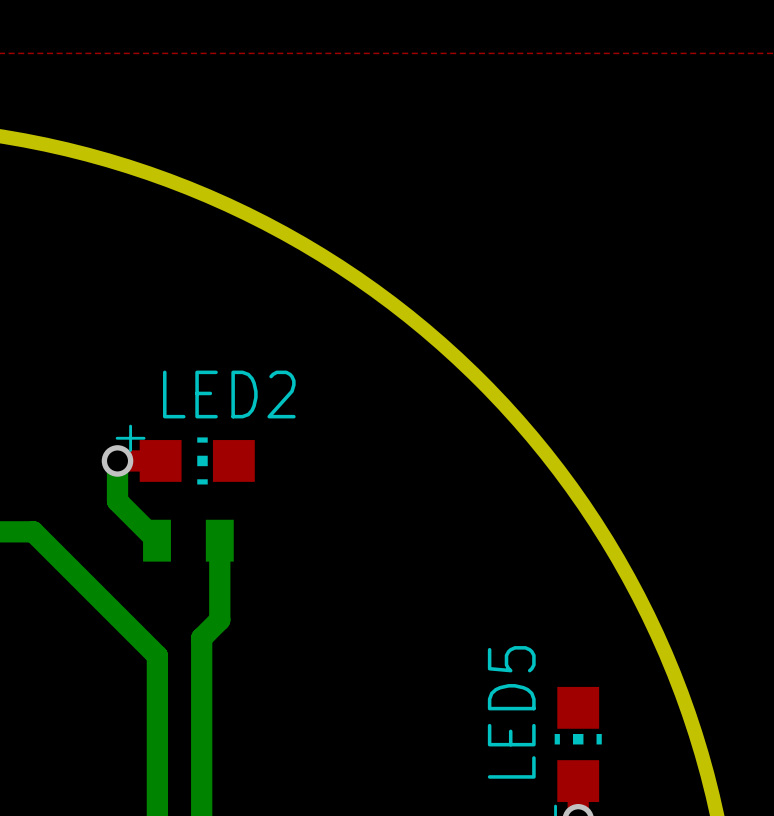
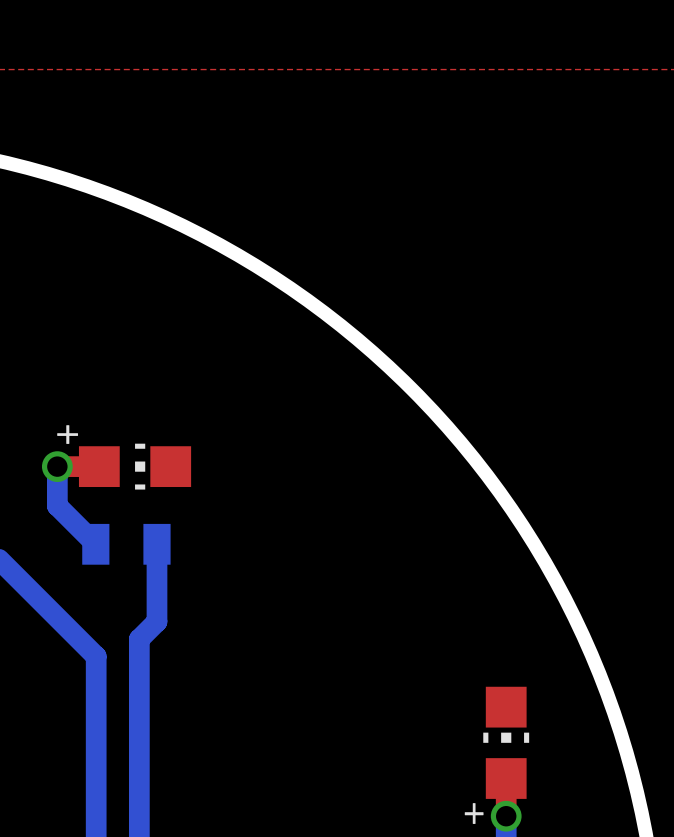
LED2 name: LED2 (229, 394) -> none
LED5 name: LED5 (511, 712) -> none

